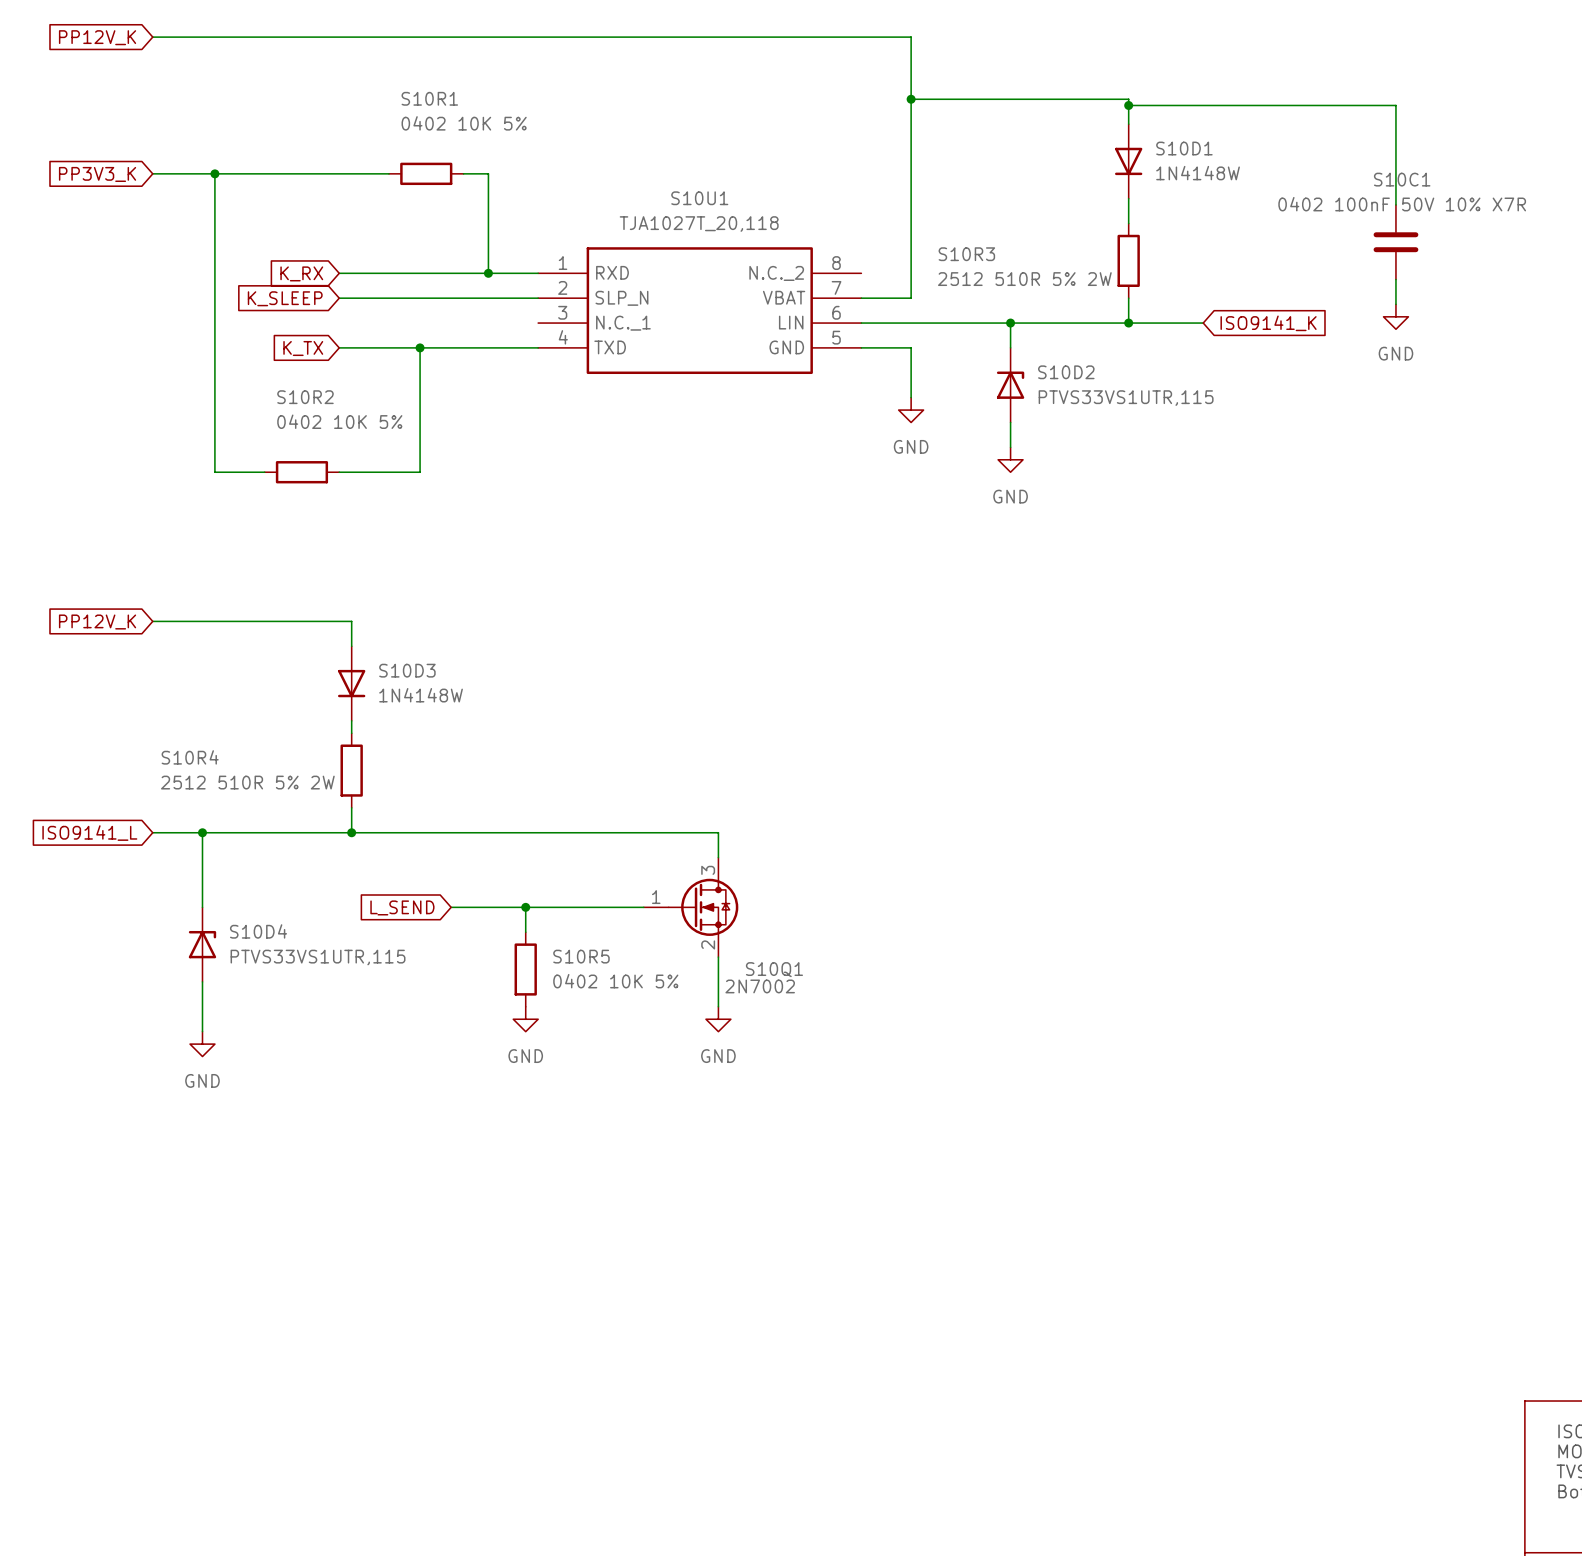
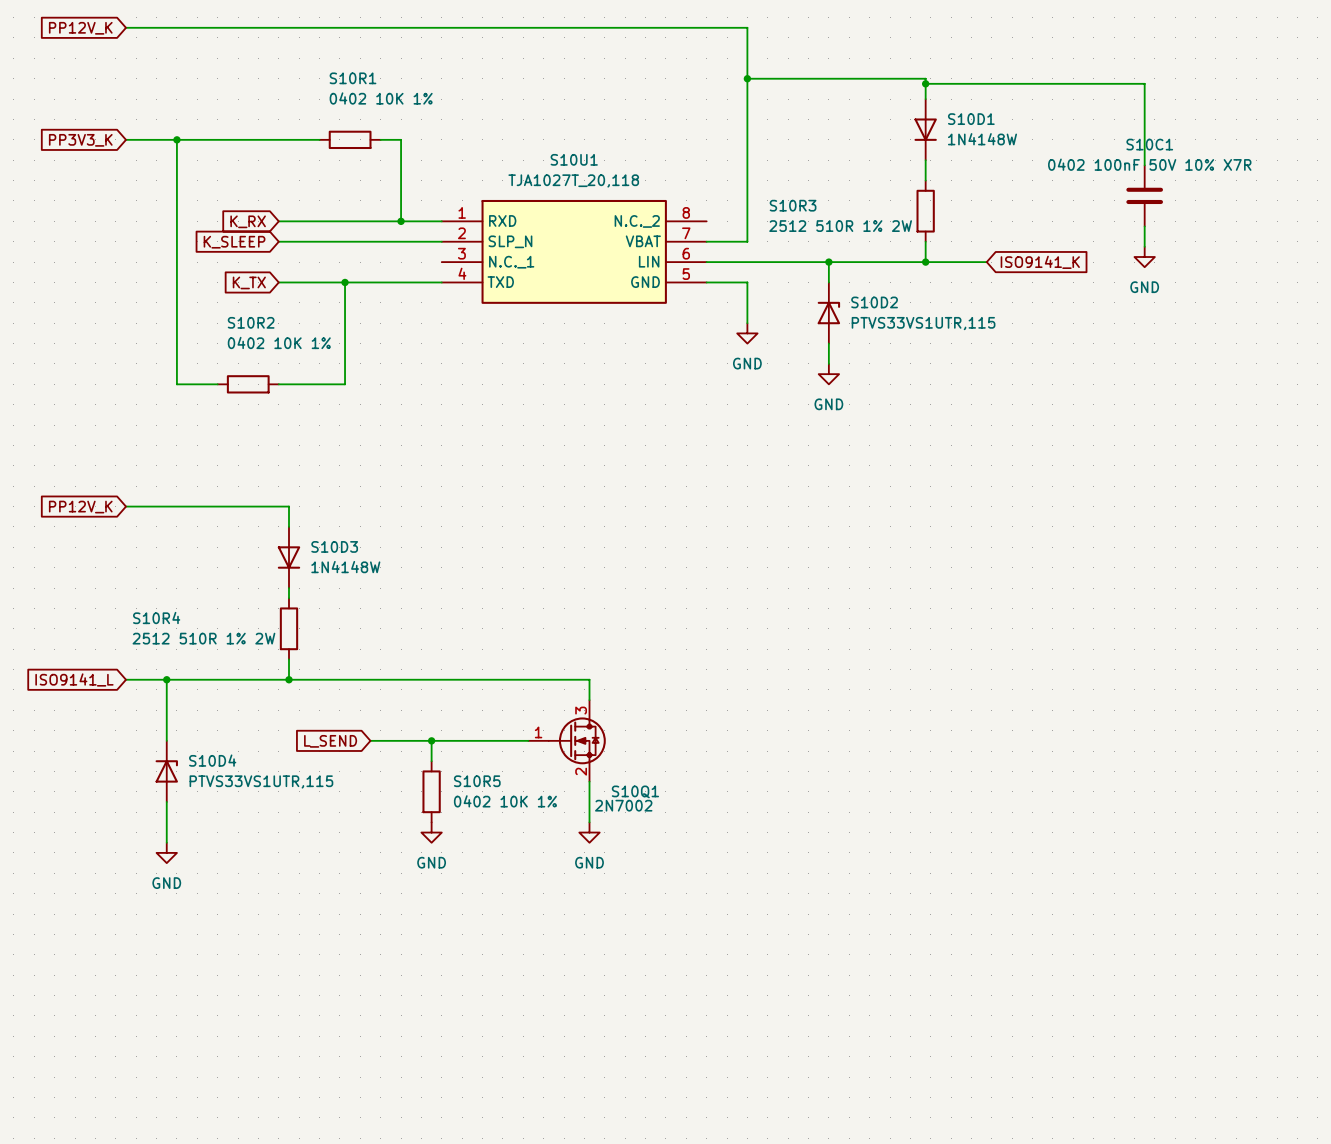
S10R1 value: 0402 10K 5% (464, 123) -> 0402 10K 1% (381, 98)
S10R3 value: 2512 510R 5% 2W (1024, 279) -> 2512 510R 1% 2W (840, 226)
S10R2 value: 0402 10K 5% (339, 421) -> 0402 10K 1% (279, 342)
S10R4 value: 2512 510R 5% 2W (247, 782) -> 2512 510R 1% 2W (203, 638)
S10R5 value: 0402 10K 5% (615, 981) -> 0402 10K 1% (505, 801)

